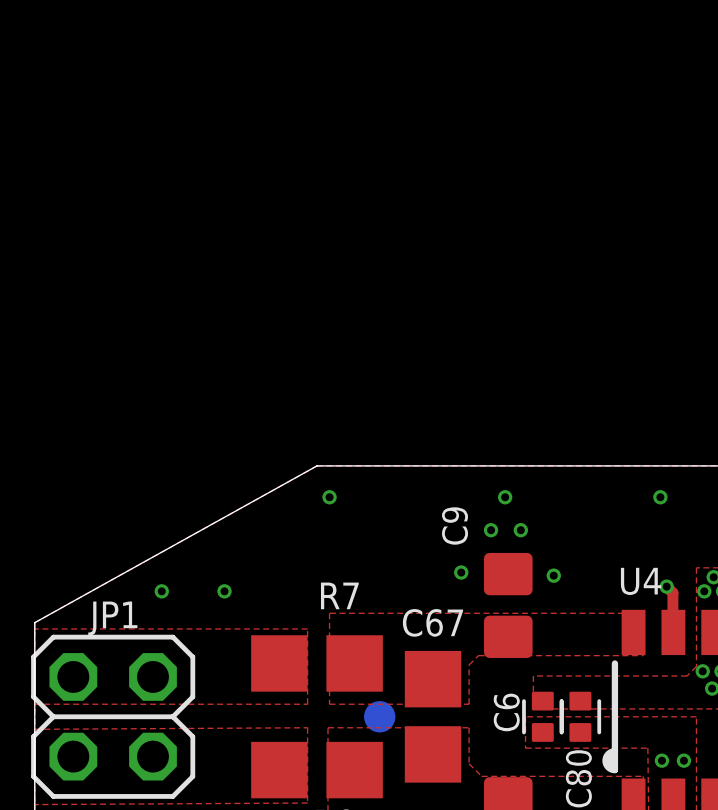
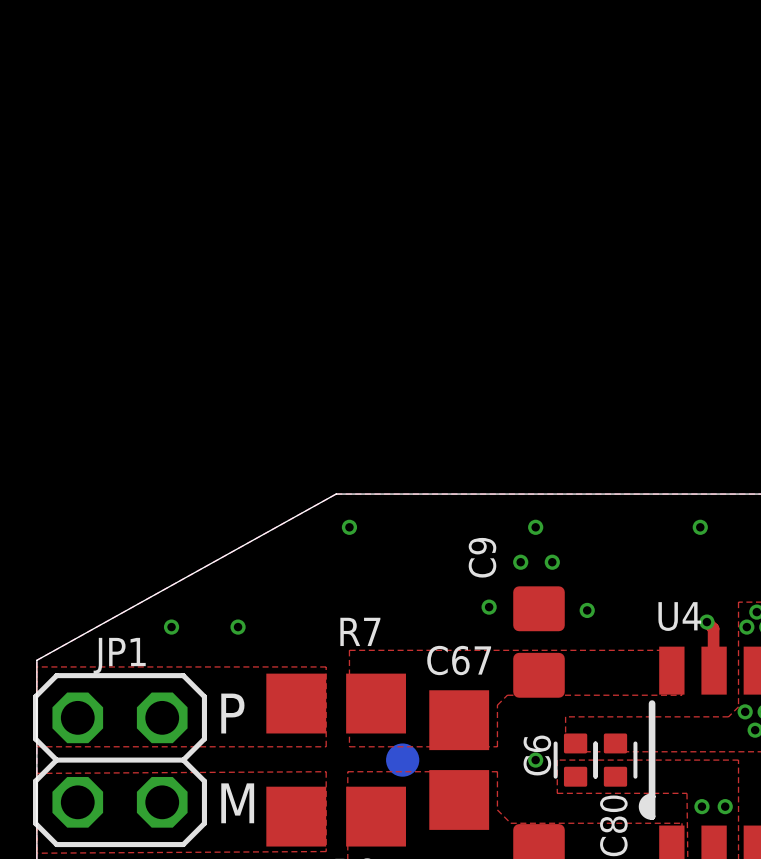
text: none -> P (232, 713)
via: none -> (535, 760)
text: none -> M (237, 803)

